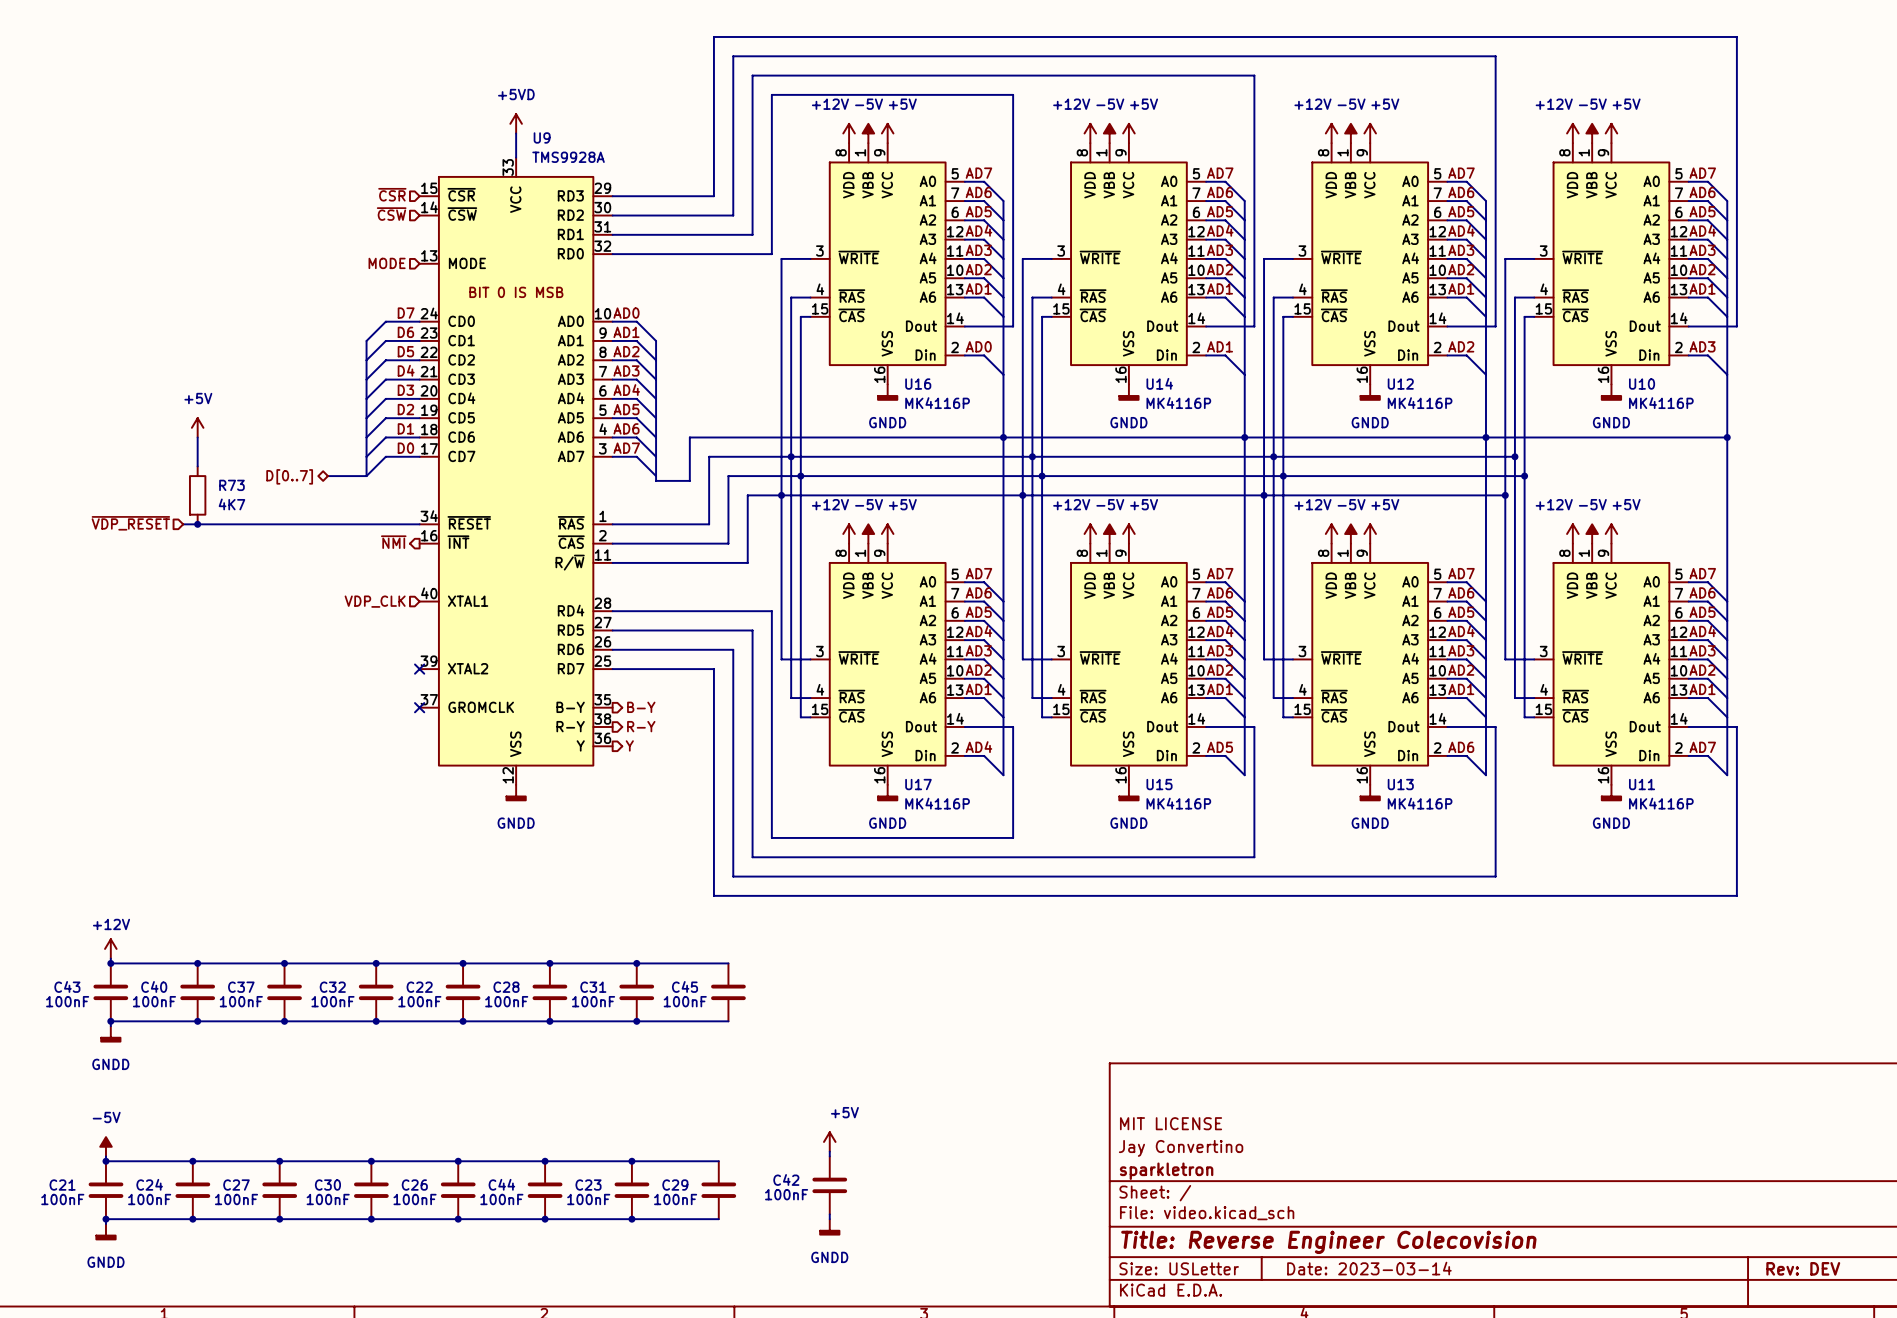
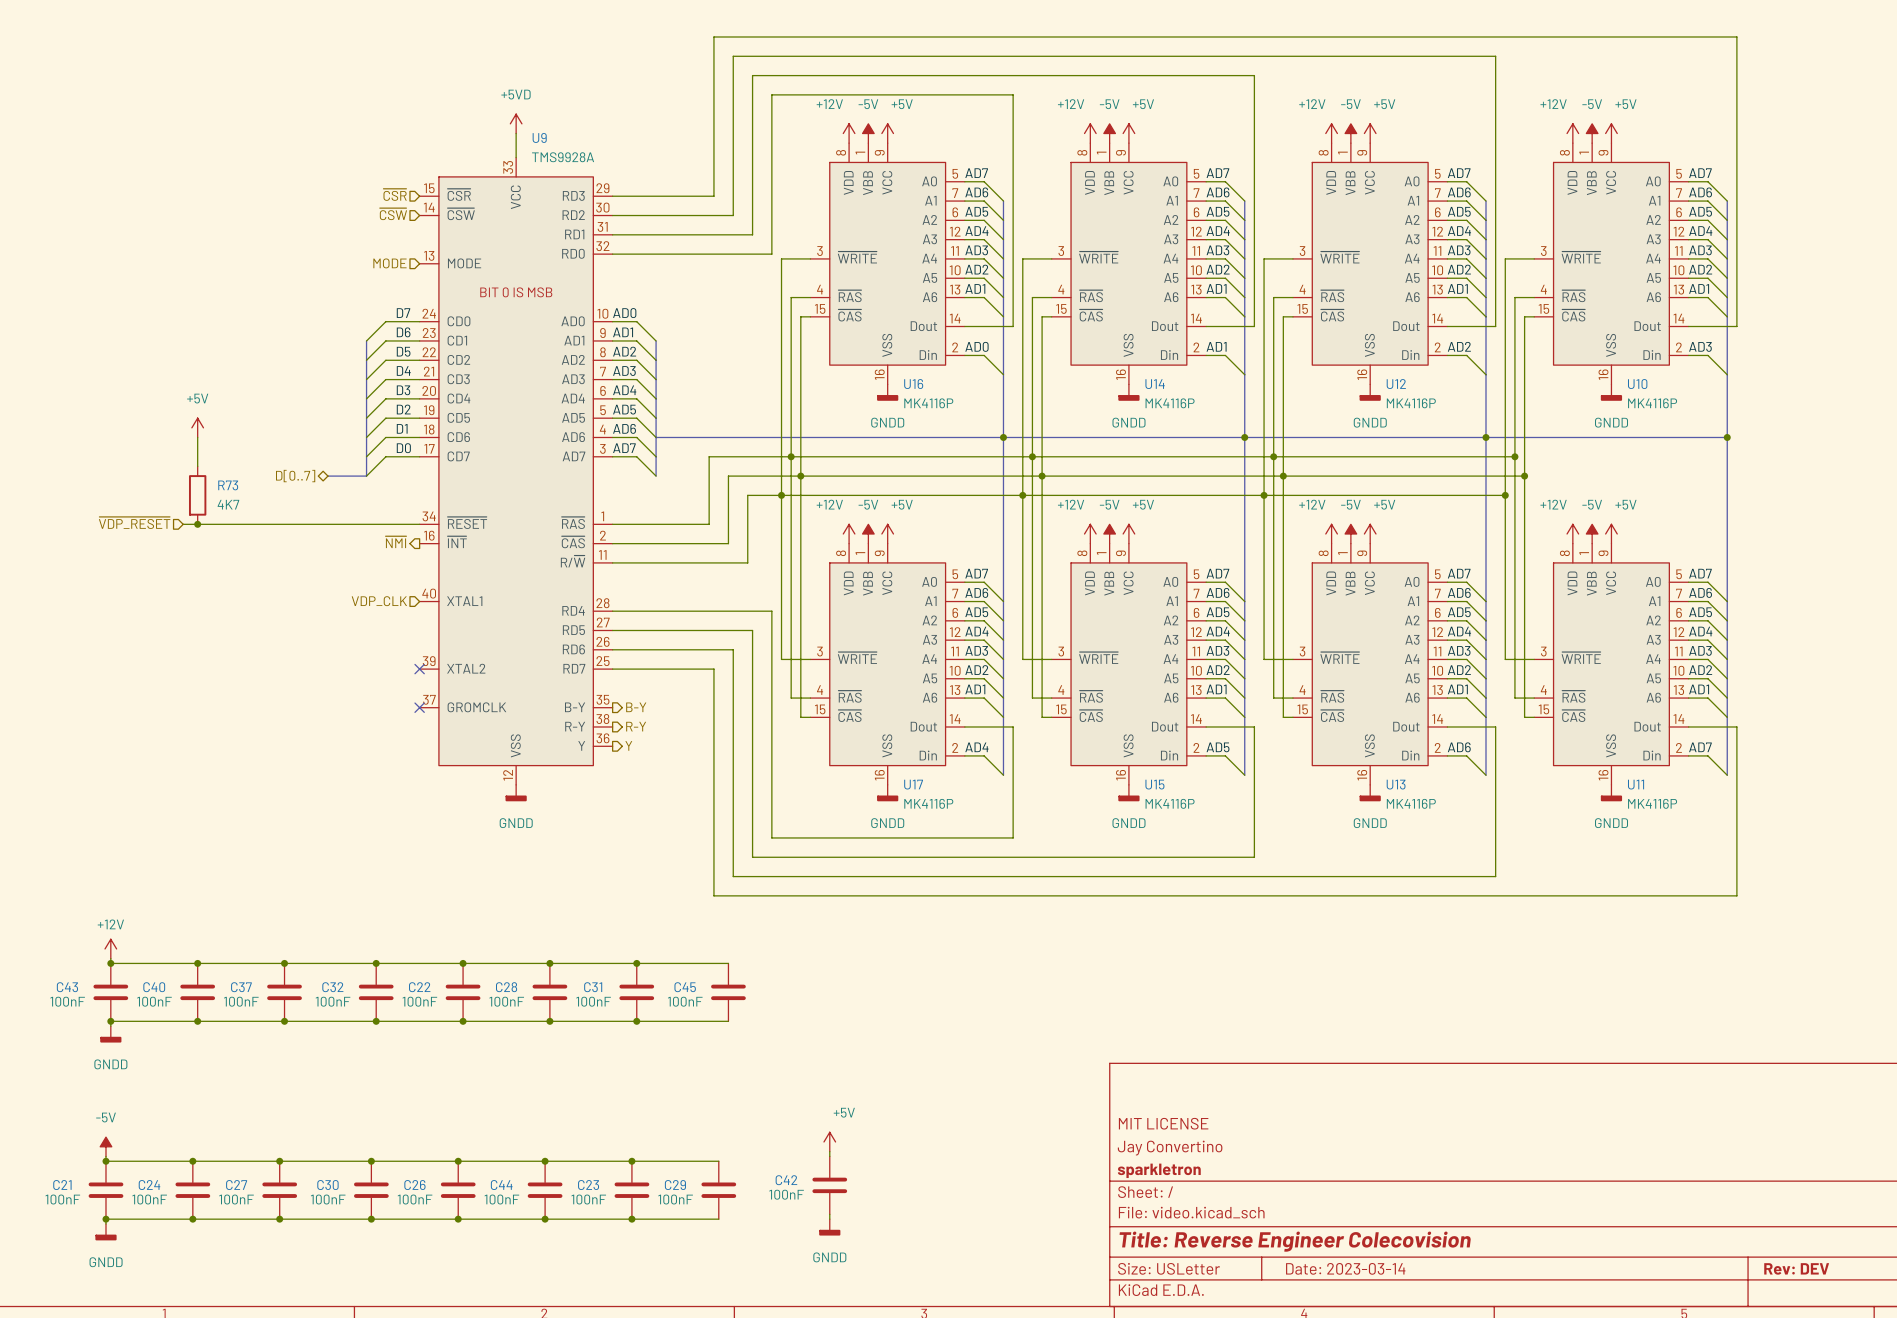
bus: (689, 437) (689, 480) (656, 480) (656, 476) -> (689, 437) (656, 437)

